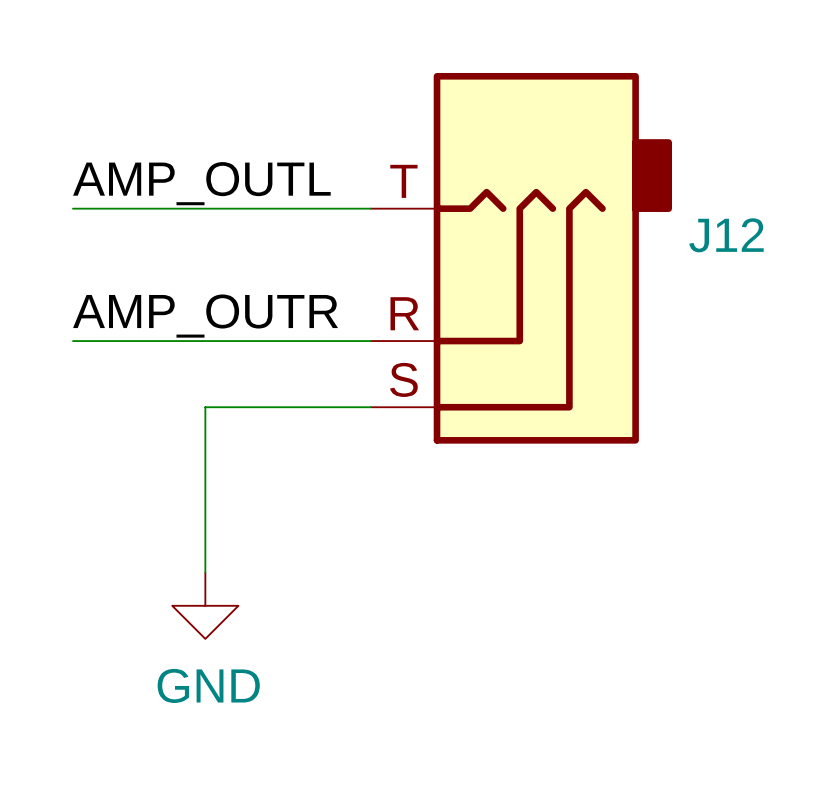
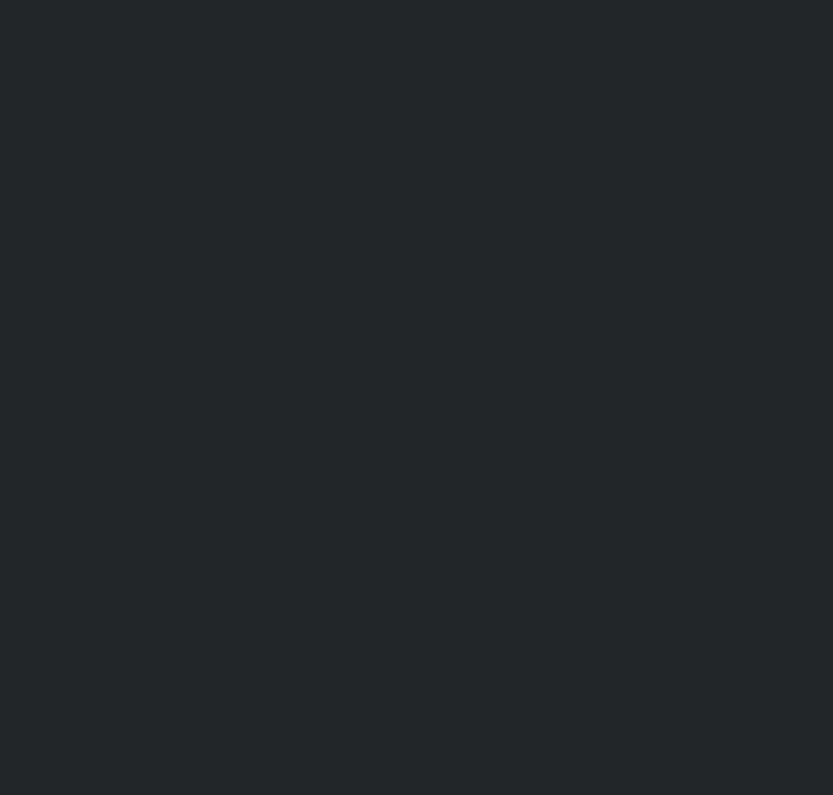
label: AMP_OUTL (201, 183) -> none
wire: (72, 208) (370, 208) -> none
J12: (521, 258) -> none
label: AMP_OUTR (205, 316) -> none
wire: (72, 341) (370, 341) -> none
wire: (370, 407) (205, 407) (205, 572) -> none
power symbol: GND (205, 605) -> none

